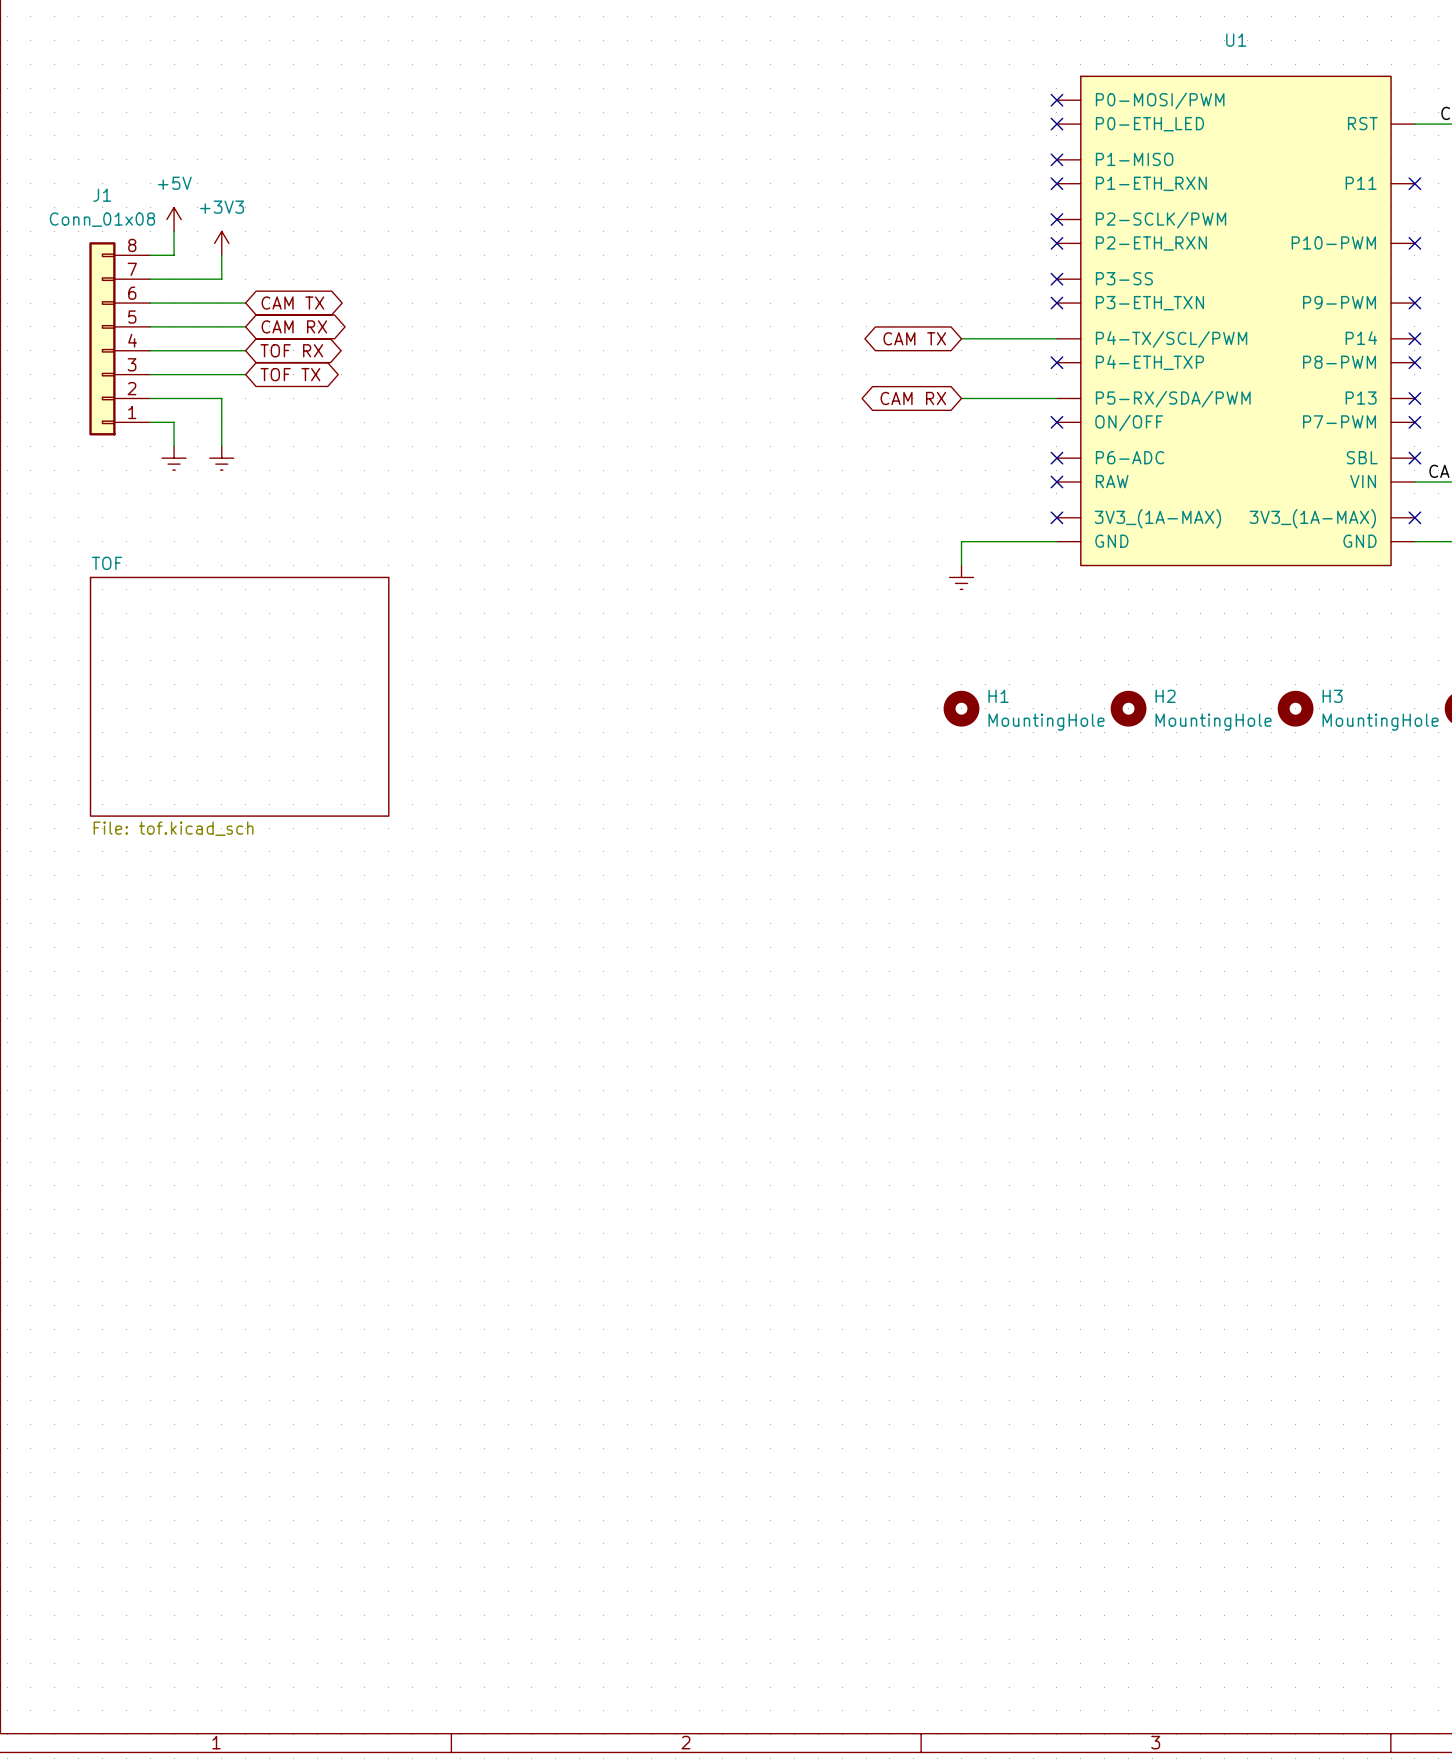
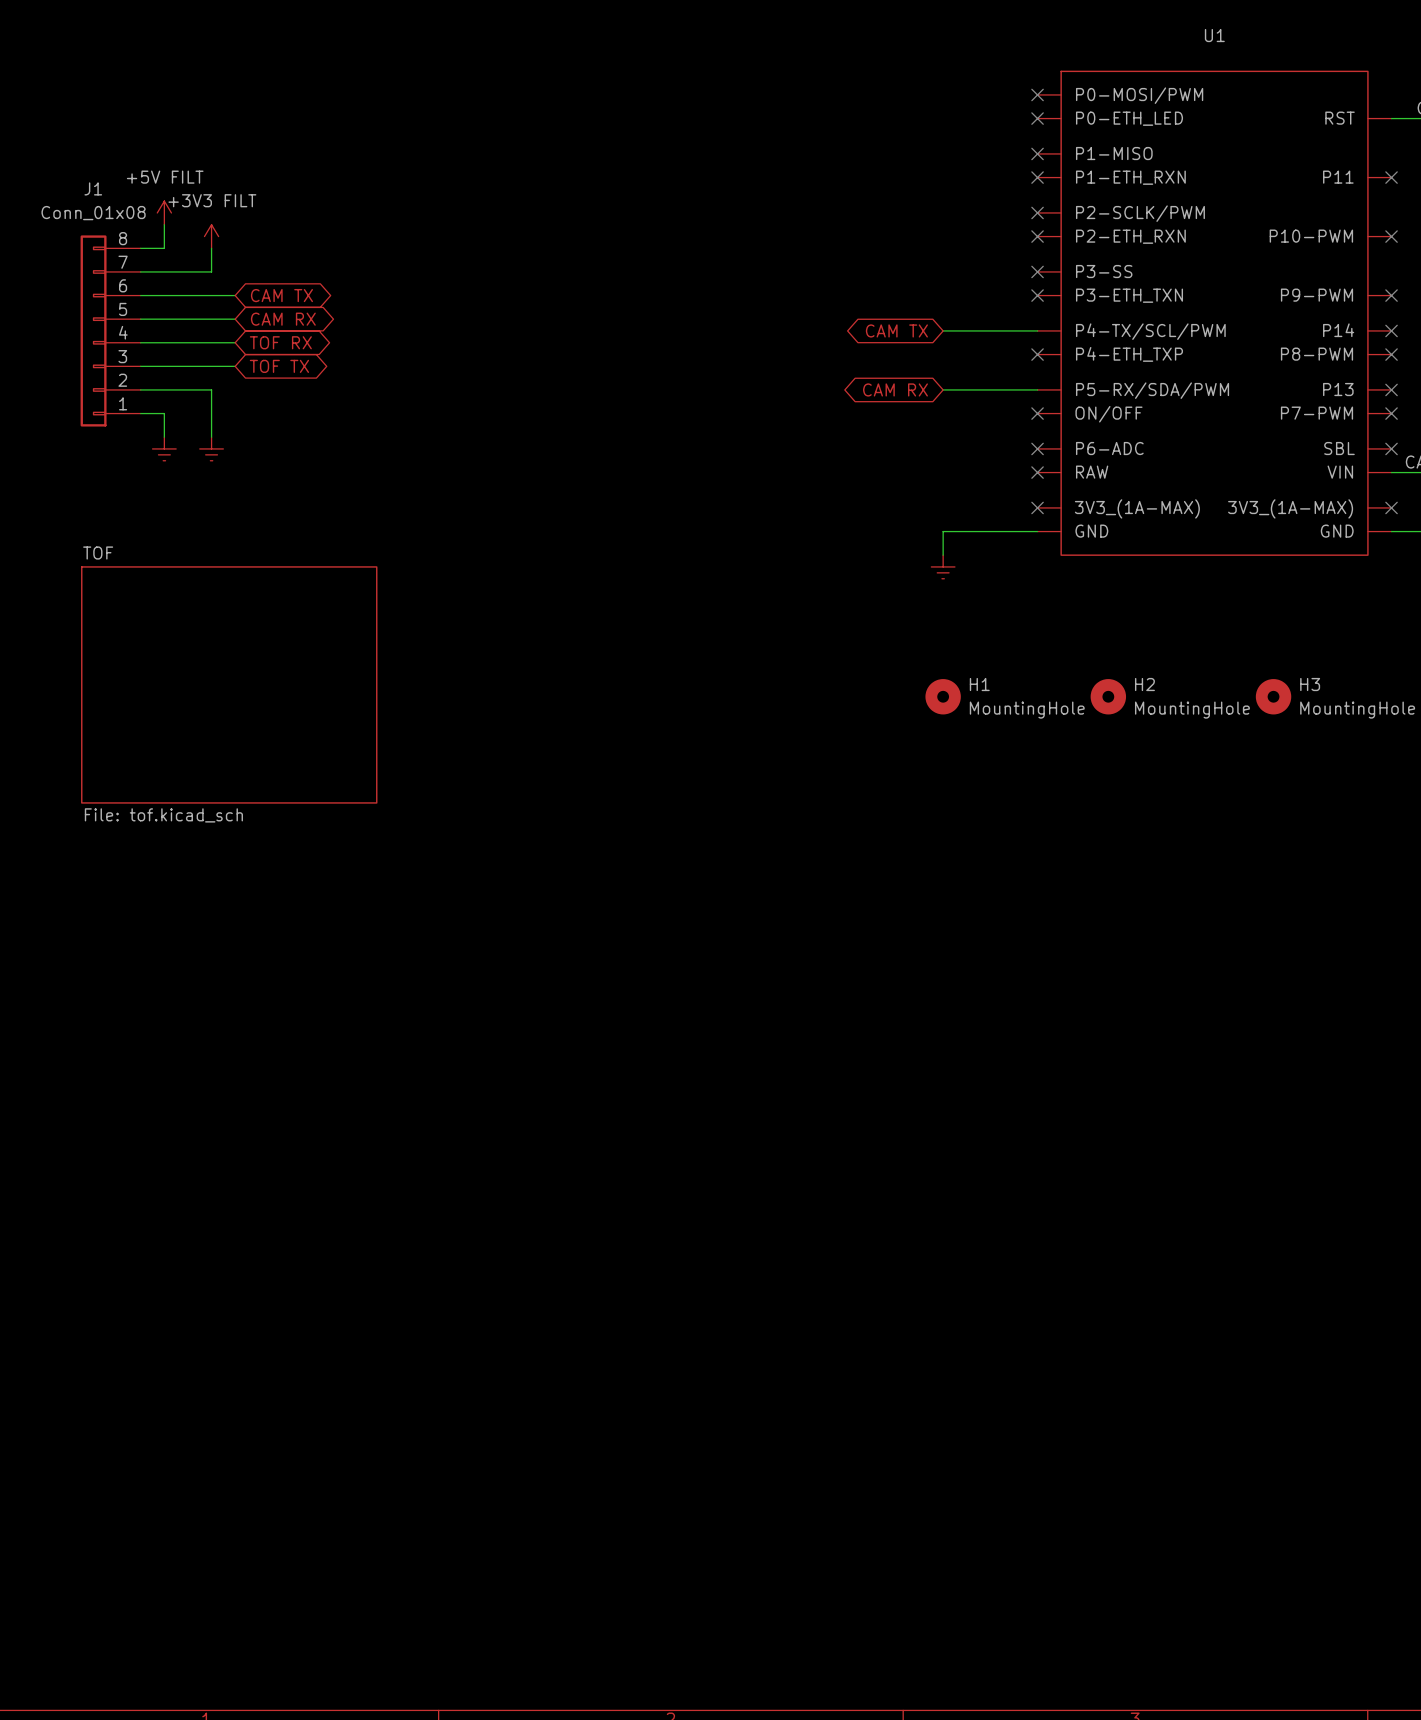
power symbol: +5V (174, 219) -> +5V FILT (164, 212)
power symbol: +3V3 (221, 243) -> +3V3 FILT (211, 236)

